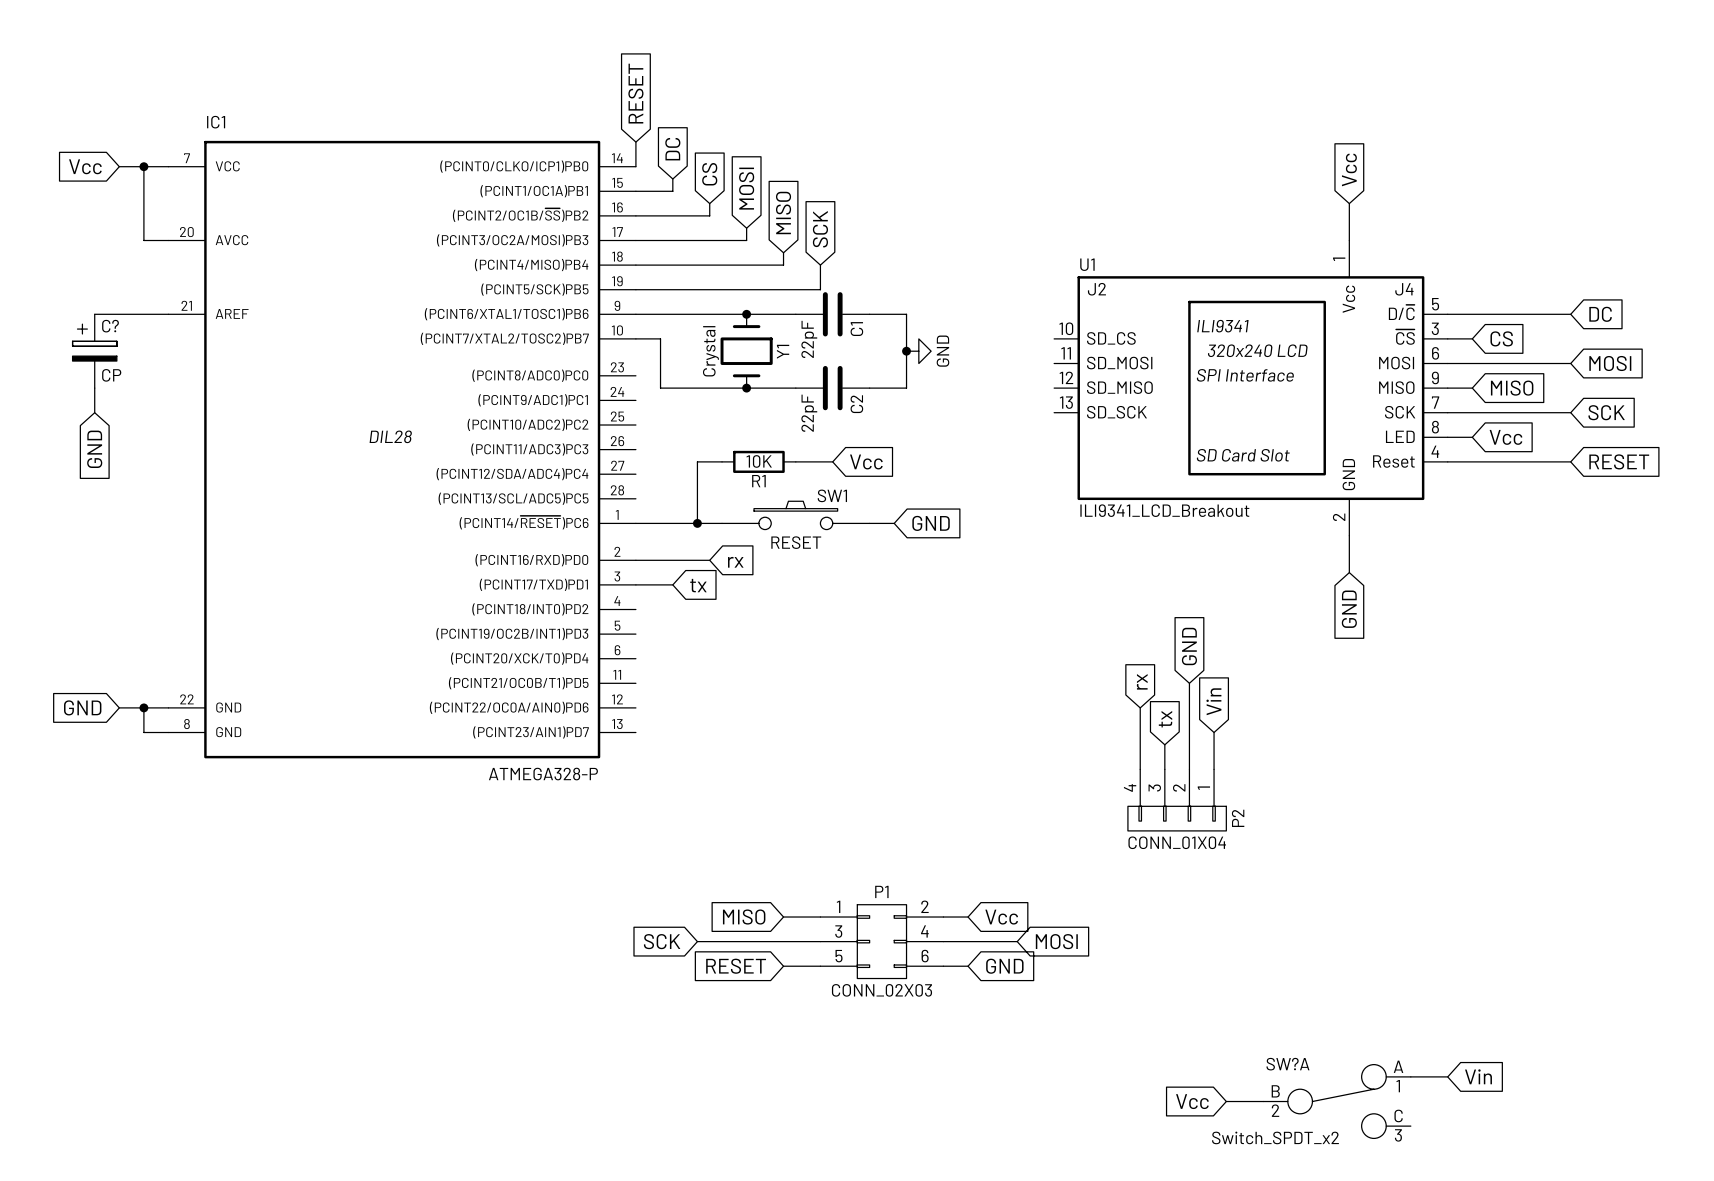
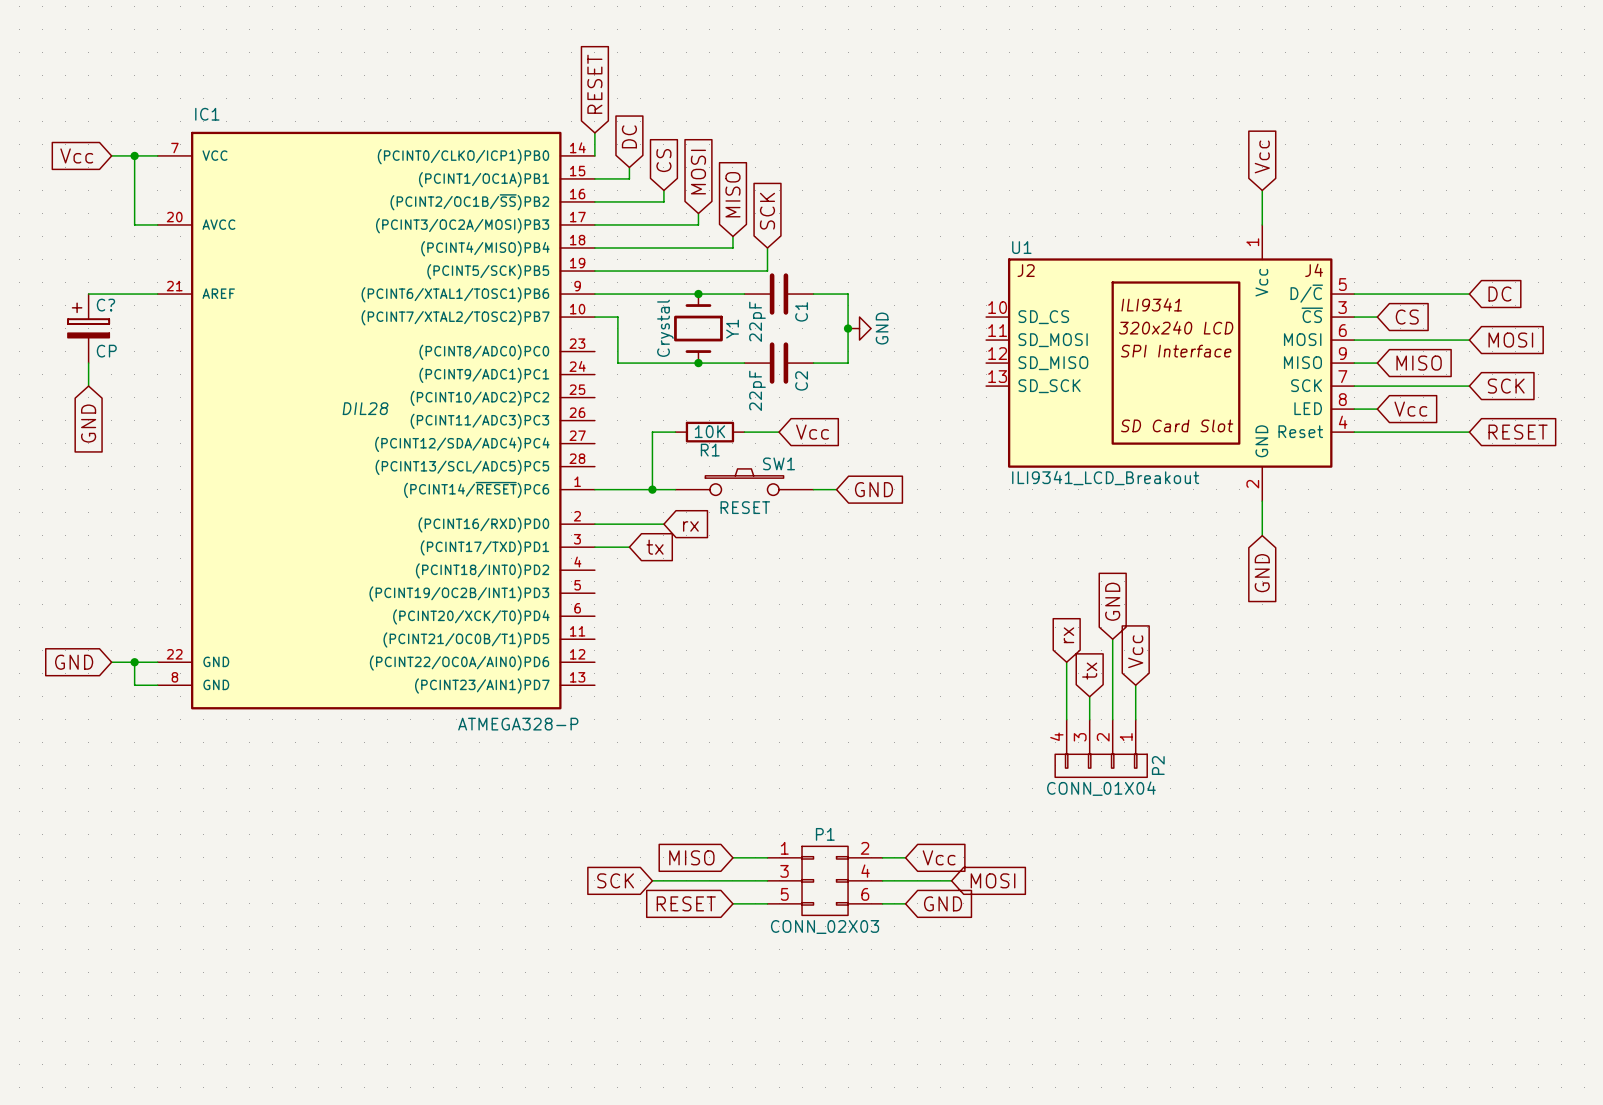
global label: Vin (1213, 701) -> Vcc (1135, 651)
wire: (1410, 1076) (1447, 1076) -> none
global label: Vin (1478, 1076) -> none
global label: Vcc (1192, 1101) -> none
wire: (1226, 1101) (1263, 1101) -> none
SW?A: Switch_SPDT_x2 (1337, 1101) -> none

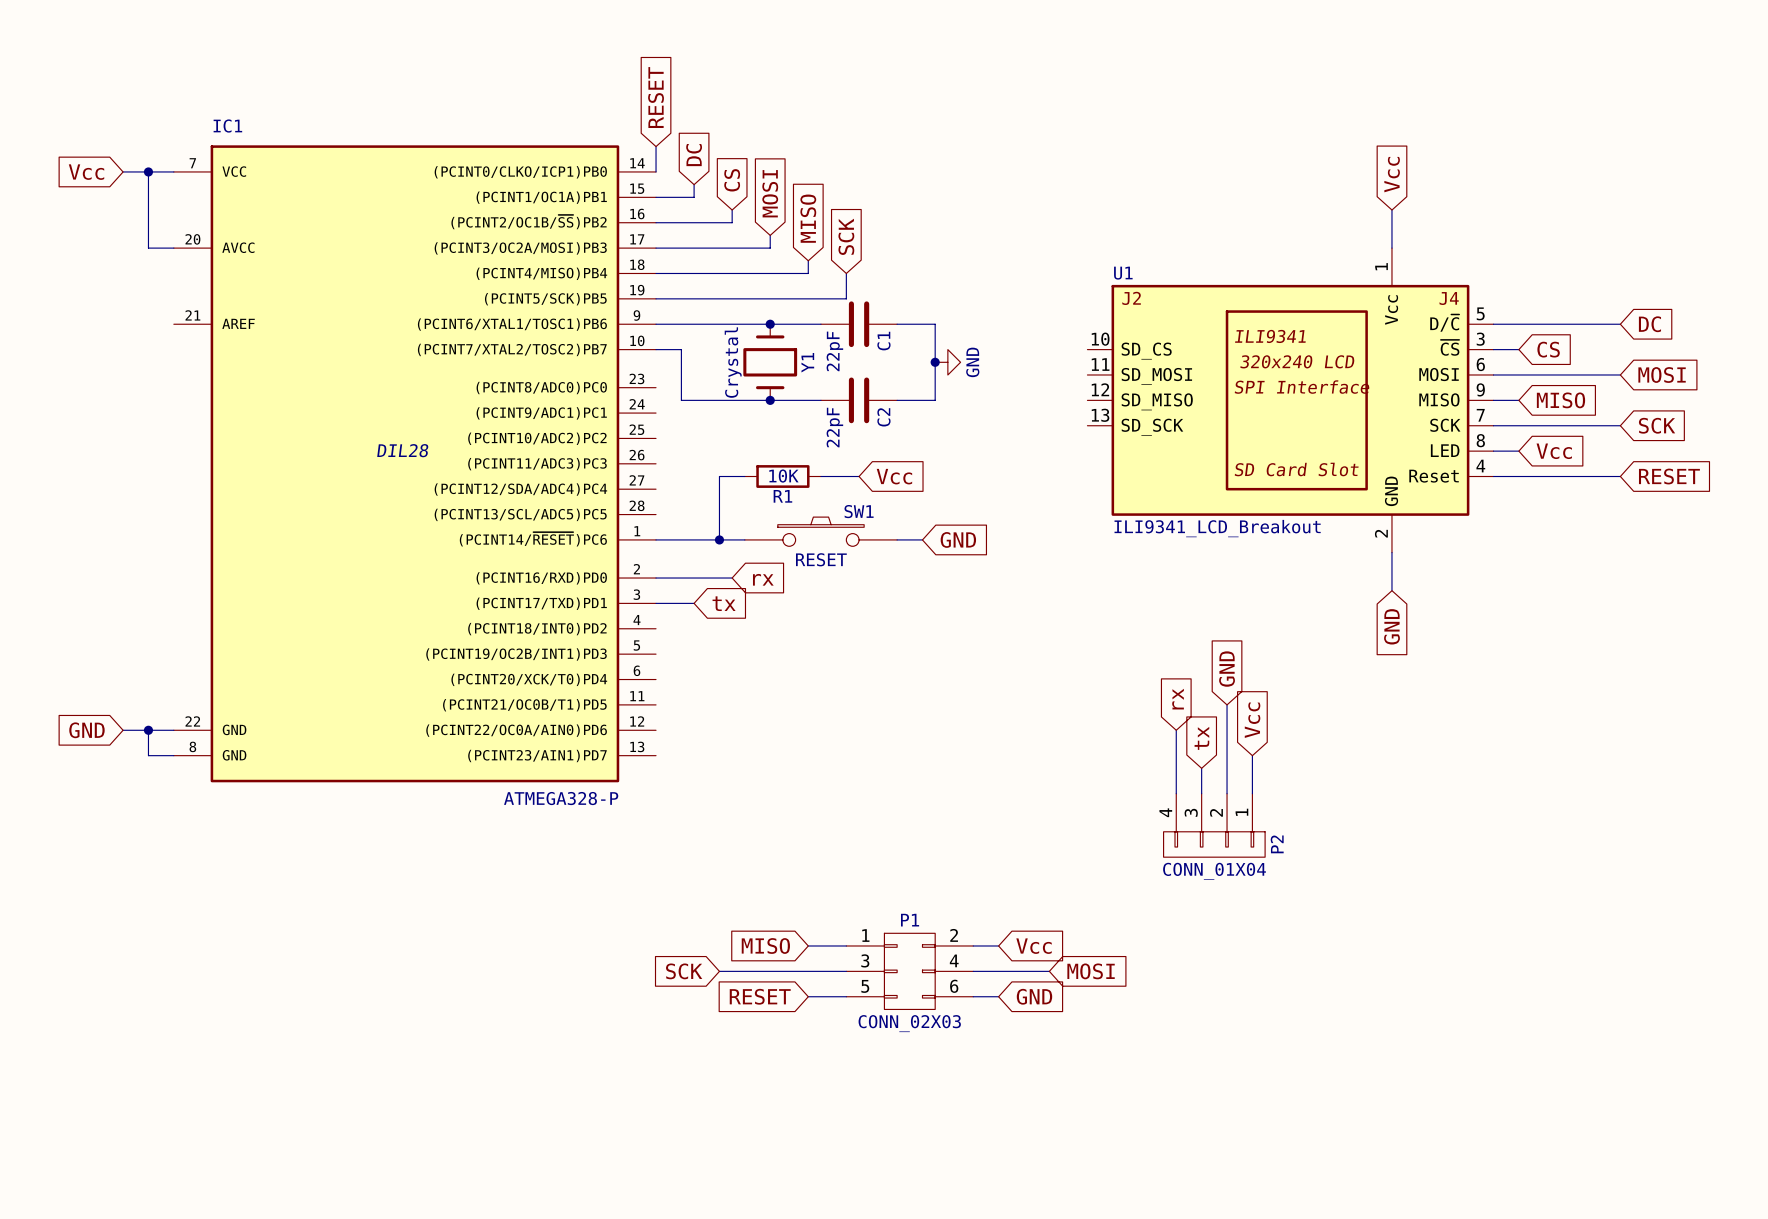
wire: (88, 294) (157, 294) -> none
C?: CP (88, 328) -> none
wire: (88, 363) (88, 386) -> none
global label: GND (88, 423) -> none

